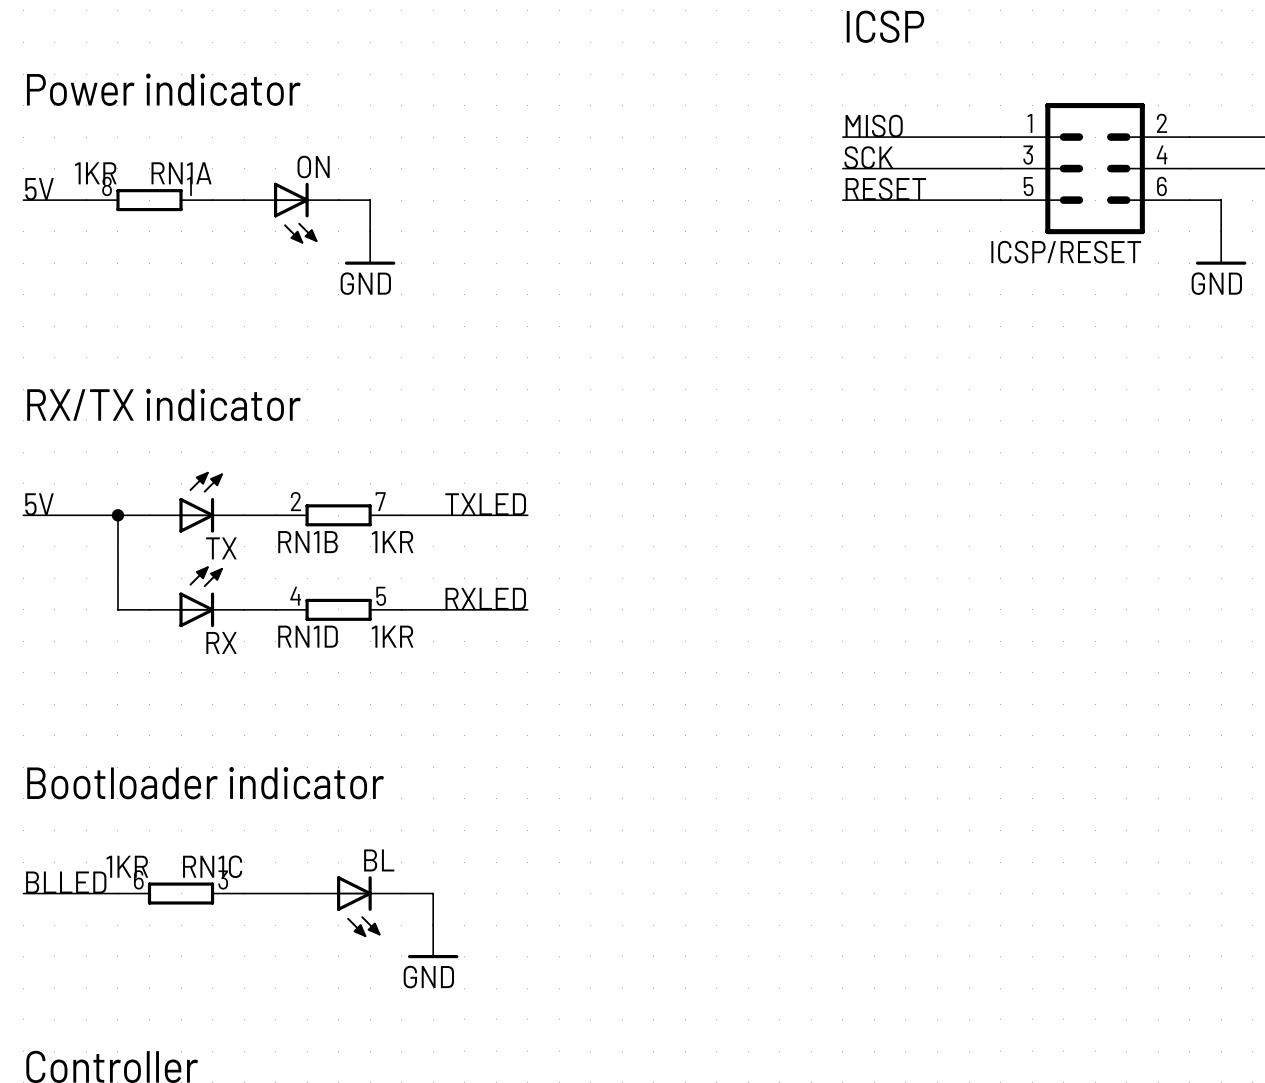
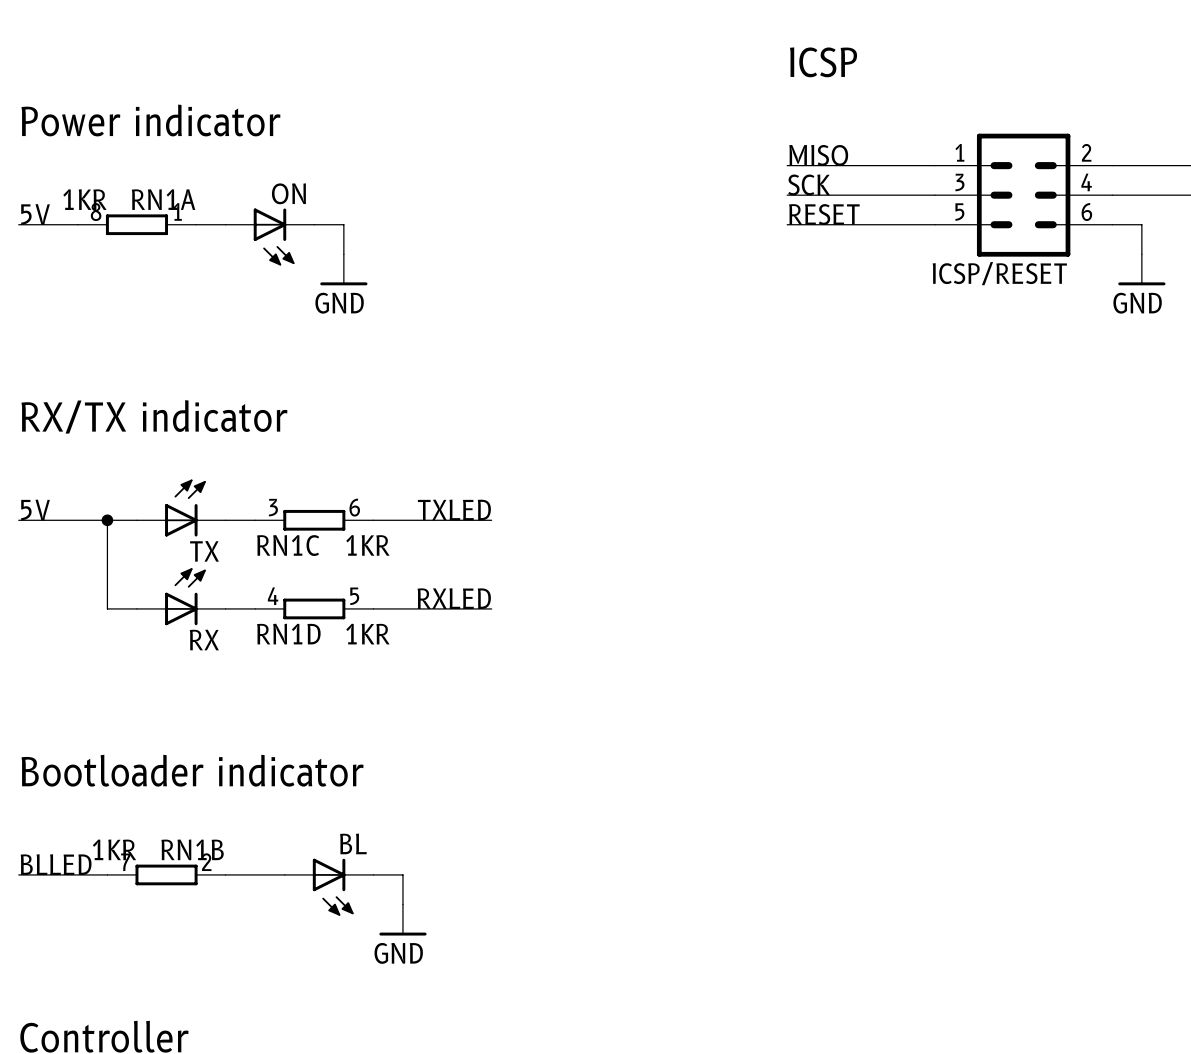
RN1B rotation: 0° (338, 515) -> 180° (166, 874)
RN1B position: (338, 515) -> (166, 874)
RN1C rotation: 0° (181, 893) -> 180° (314, 520)
RN1C position: (181, 893) -> (314, 520)

